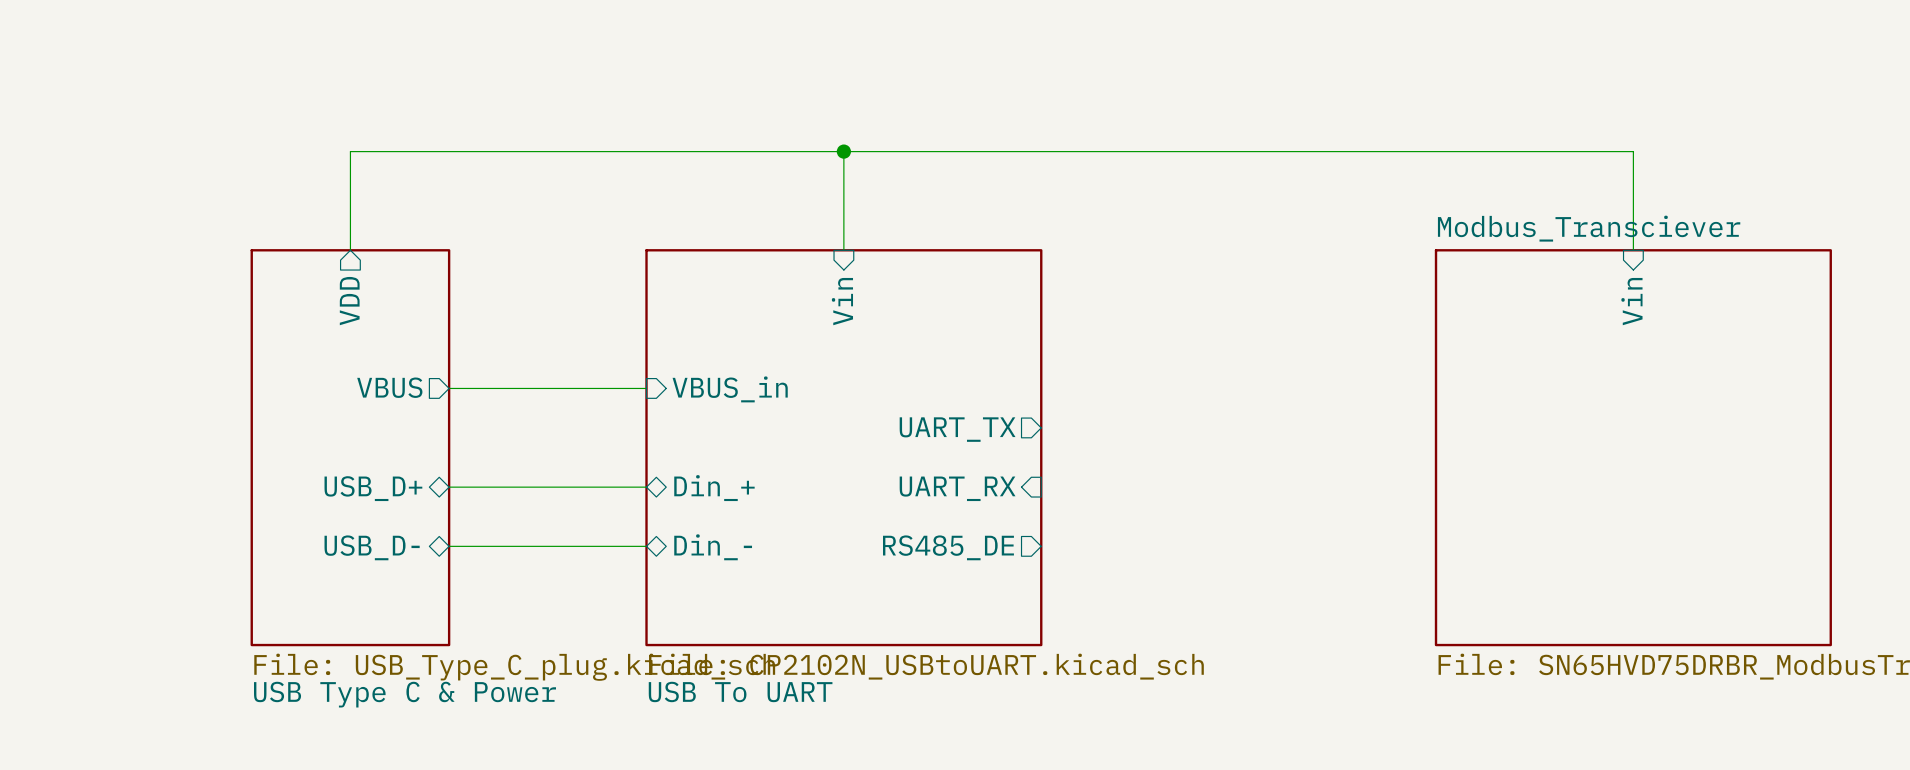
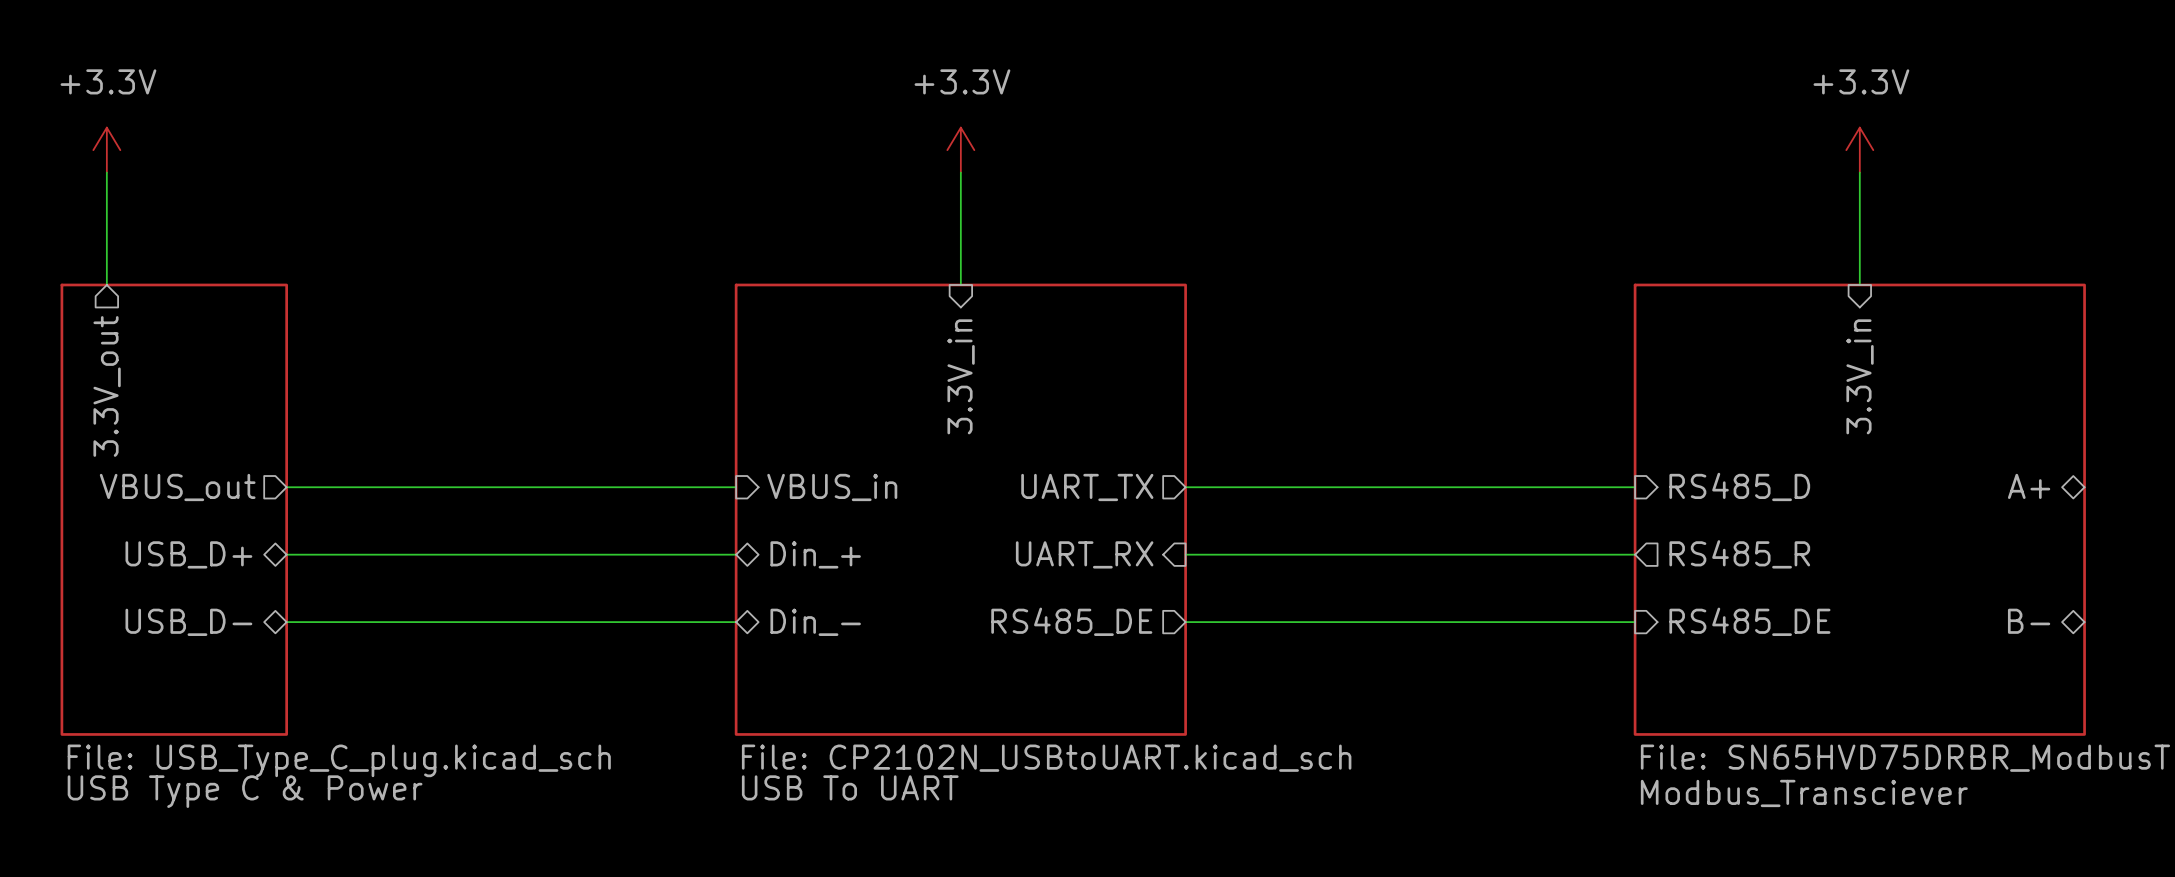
power symbol: none -> +3.3V (106, 150)
power symbol: none -> +3.3V (960, 150)
power symbol: none -> +3.3V (1859, 150)
wire: none -> (106, 172) (106, 284)
junction: (843, 151) -> none
wire: (1633, 151) (350, 151) (350, 250) -> none
sheet Modbus_Transciever name position: Modbus_Transciever (1589, 228) -> Modbus_Transciever (1804, 793)
sheet pin: VDD (349, 301) -> none
sheet pin: Vin (842, 301) -> 3.3V_in (961, 376)
sheet pin: Vin (1631, 301) -> 3.3V_in (1860, 376)
sheet pin: none -> 3.3V_out (107, 386)
sheet pin: VBUS (389, 387) -> none
wire: (449, 388) (646, 388) -> (286, 554) (511, 554)
sheet pin position: VBUS_in (730, 389) -> VBUS_in (832, 487)
wire: none -> (286, 487) (736, 487)
wire: none -> (1185, 487) (1635, 487)
sheet pin: none -> A+ (2029, 486)
sheet pin: none -> VBUS_out (177, 487)
sheet pin: none -> RS485_D (1739, 486)
sheet USB Type C & Power position: (350, 447) -> (174, 509)
wire: none -> (1185, 554) (1635, 554)
sheet pin position: USB_D+ (373, 488) -> USB_D+ (188, 554)
sheet pin: none -> RS485_R (1739, 554)
sheet pin: none -> B- (2029, 621)
wire: none -> (286, 622) (511, 622)
wire: none -> (1185, 622) (1635, 622)
sheet pin position: USB_D- (372, 547) -> USB_D- (188, 622)
sheet pin: none -> RS485_DE (1749, 621)

